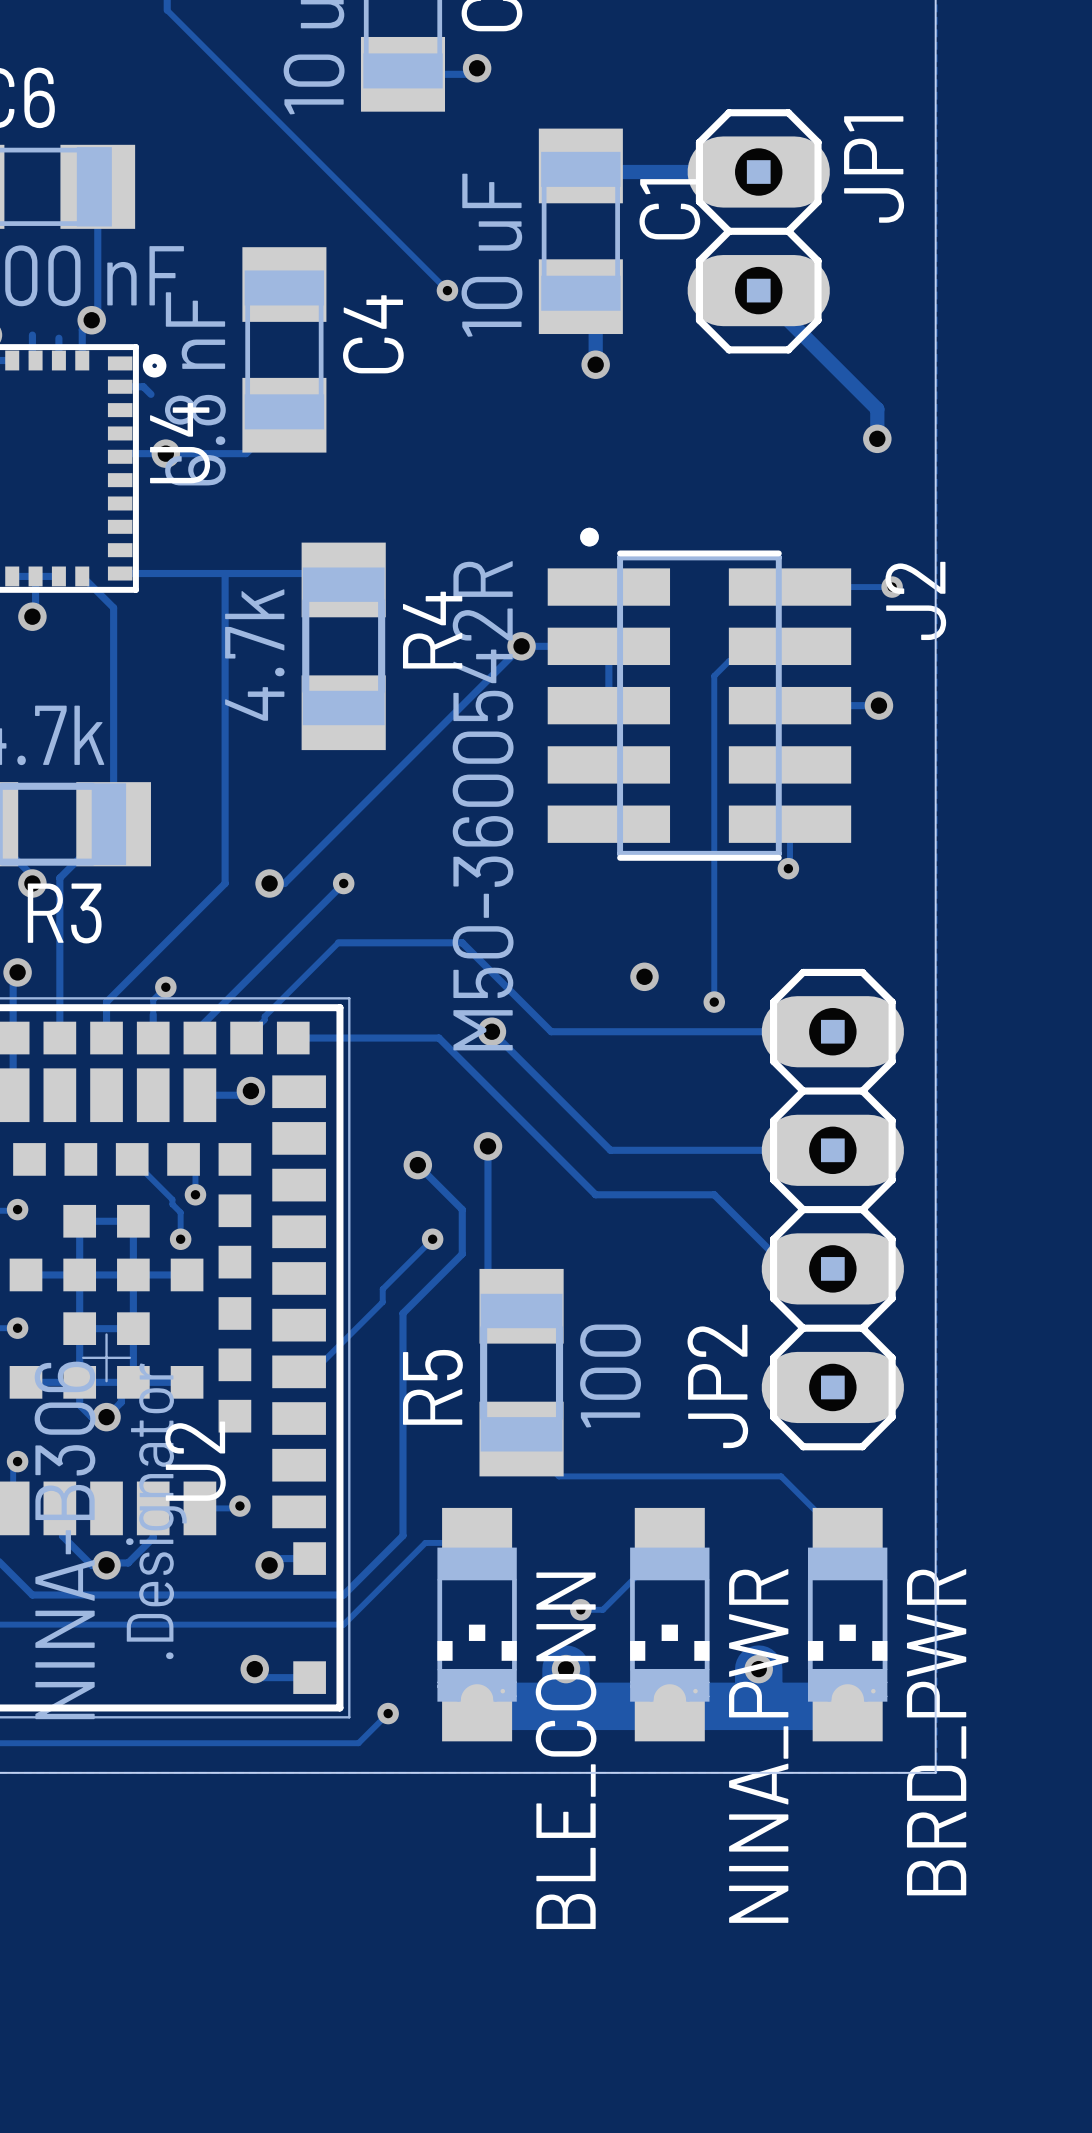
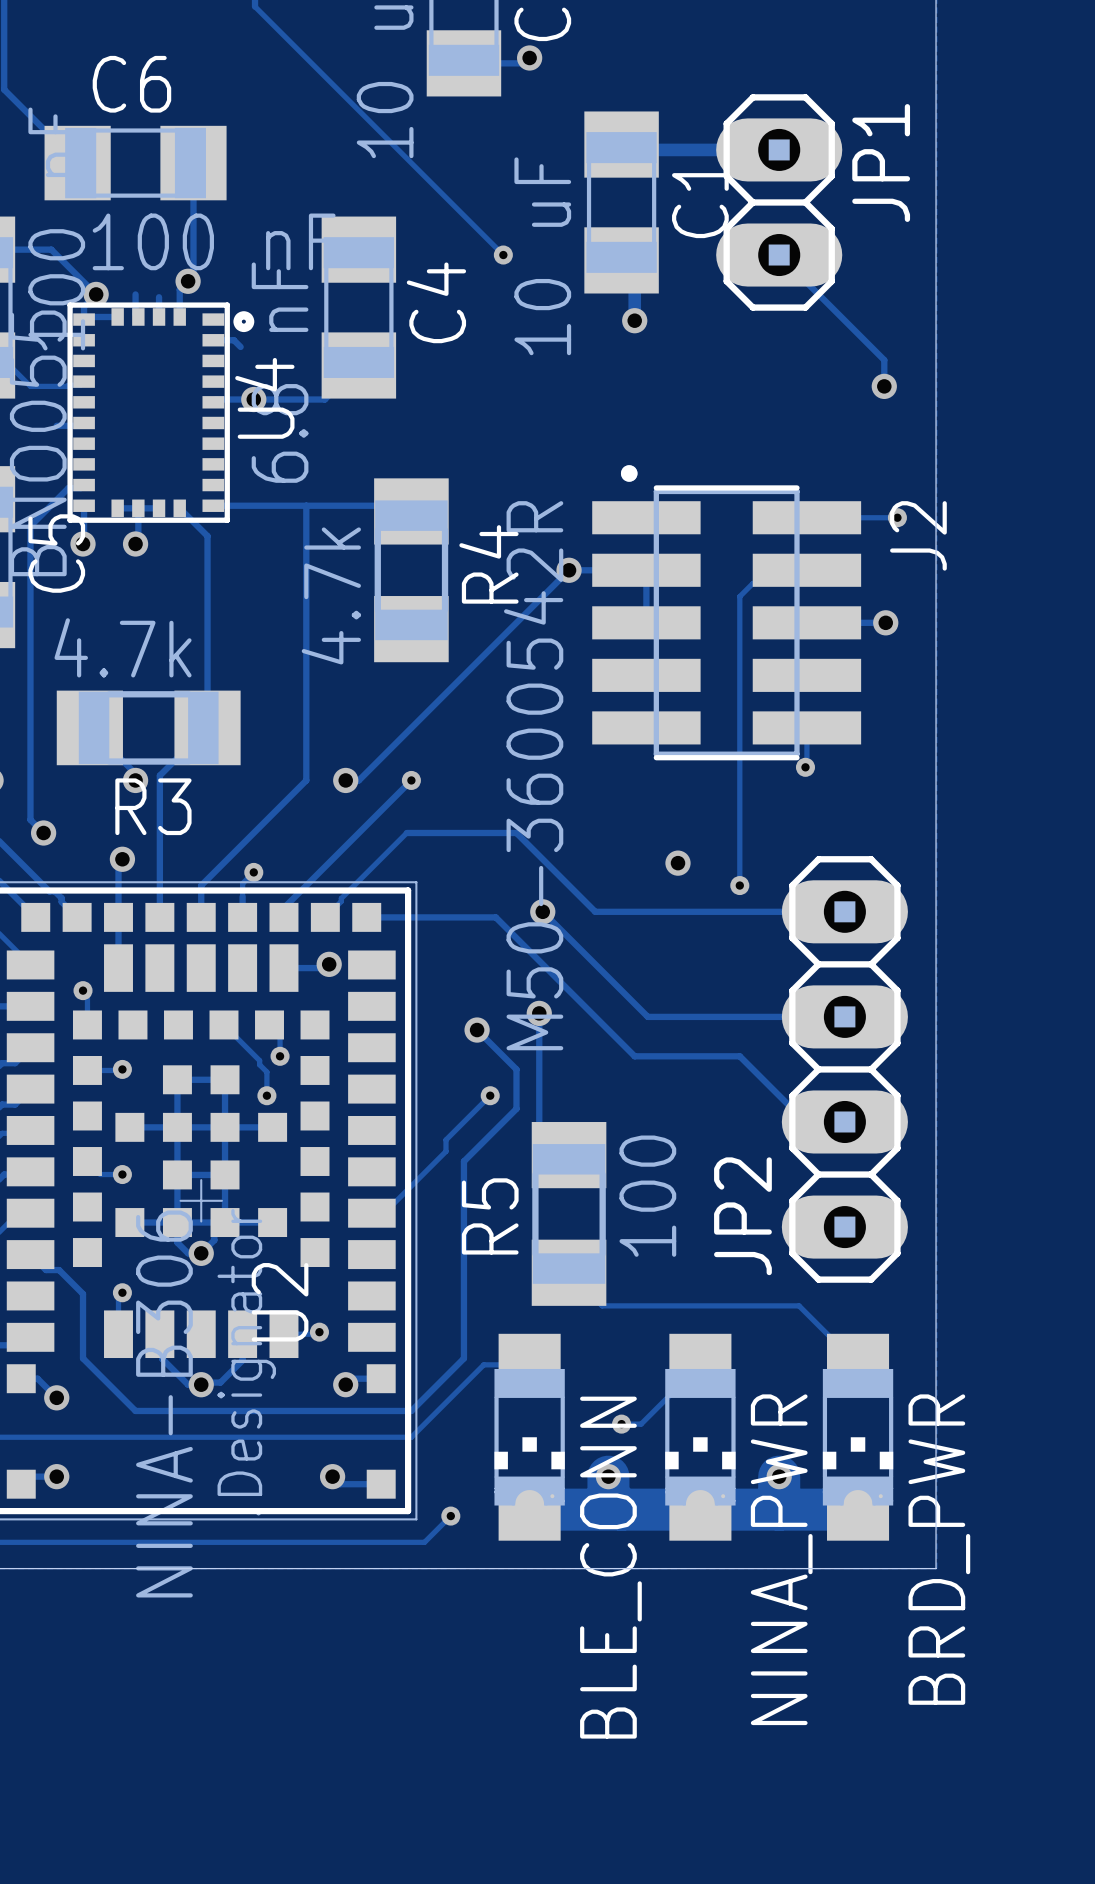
track width: thick (758, 290) (877, 409) (877, 438) -> thin (779, 255) (884, 360) (884, 386)

